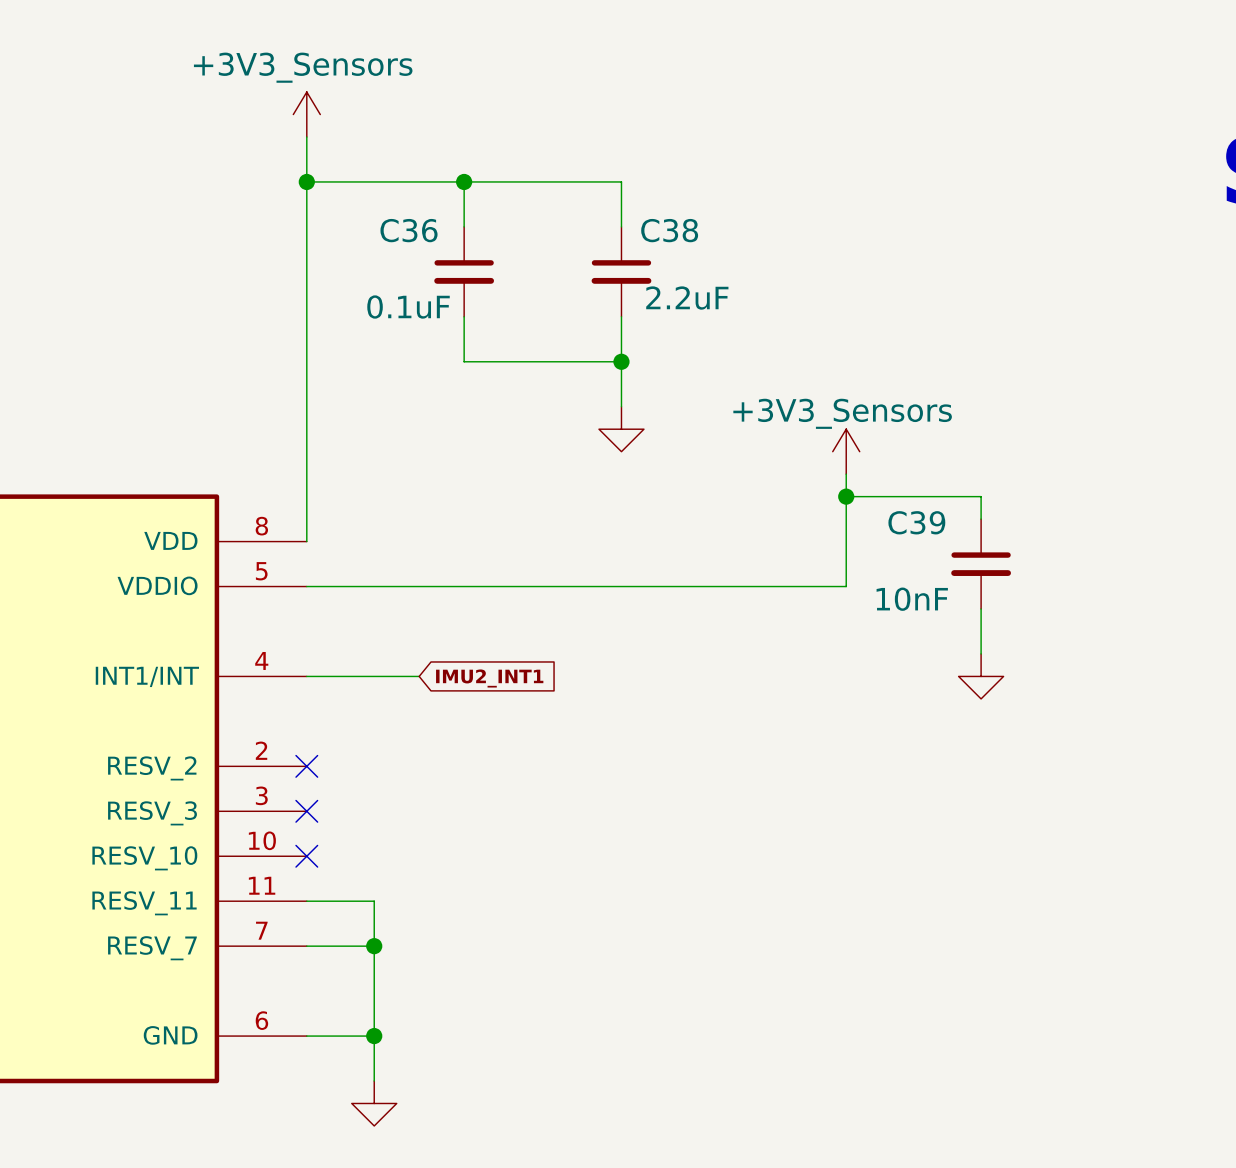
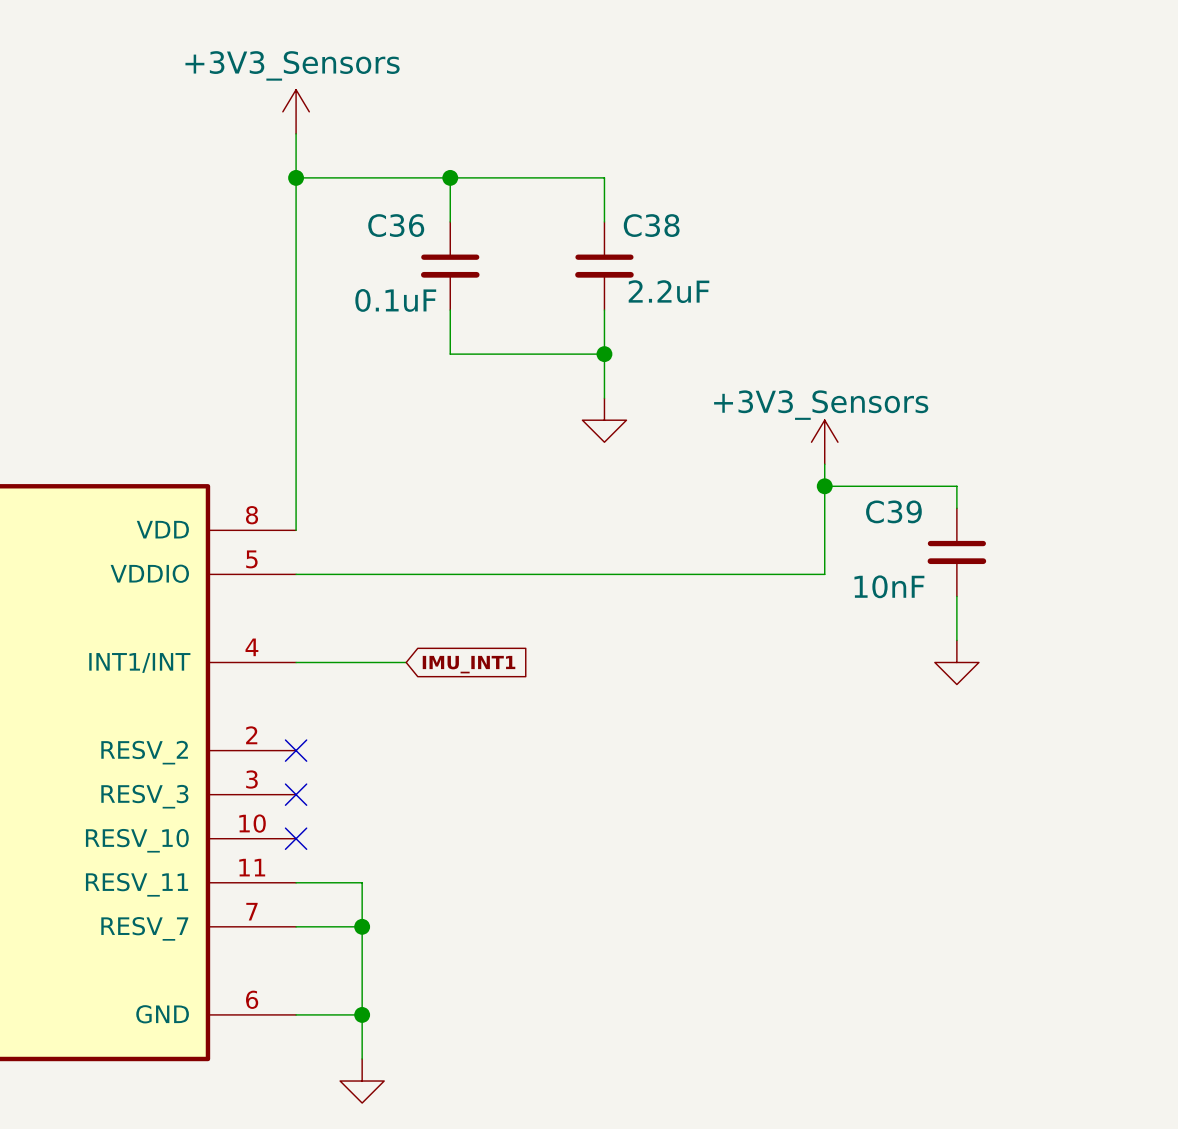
global label: IMU2_INT1 (489, 678) -> IMU_INT1 (469, 664)

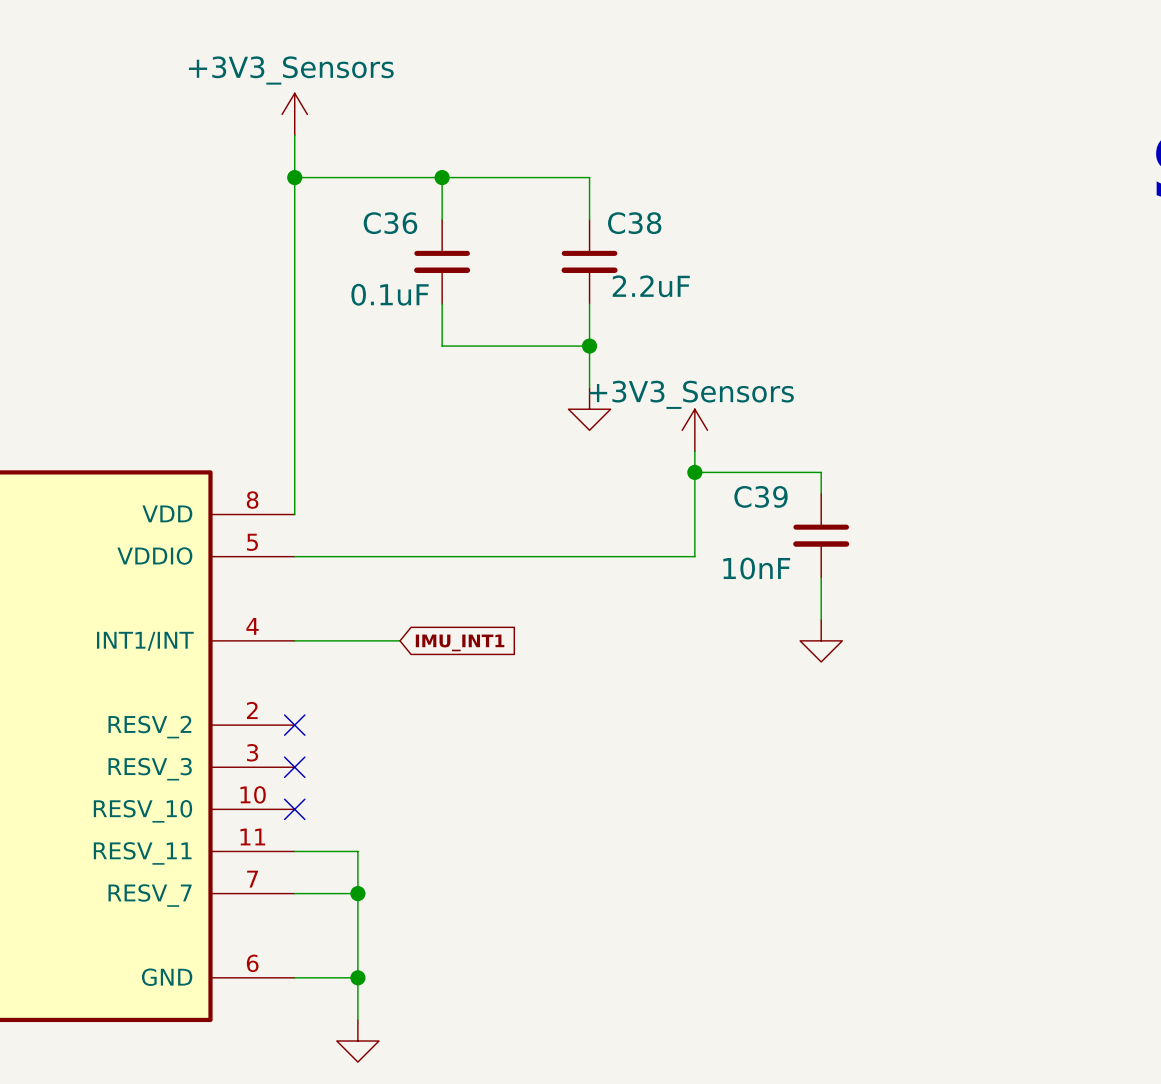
power symbol position: +3V3_Sensors (824, 442) -> +3V3_Sensors (694, 430)
wire: (824, 464) (824, 574) (714, 574) -> (694, 451) (694, 556)
wire: none -> (694, 472) (800, 472)
junction: none -> (694, 472)
junction: (824, 486) -> none
wire: (846, 486) (956, 486) (956, 508) -> (821, 472) (821, 493)
C39 position: (956, 552) -> (821, 535)
wire: (956, 596) (956, 640) -> (821, 577) (821, 619)
power symbol position: (956, 662) -> (821, 640)

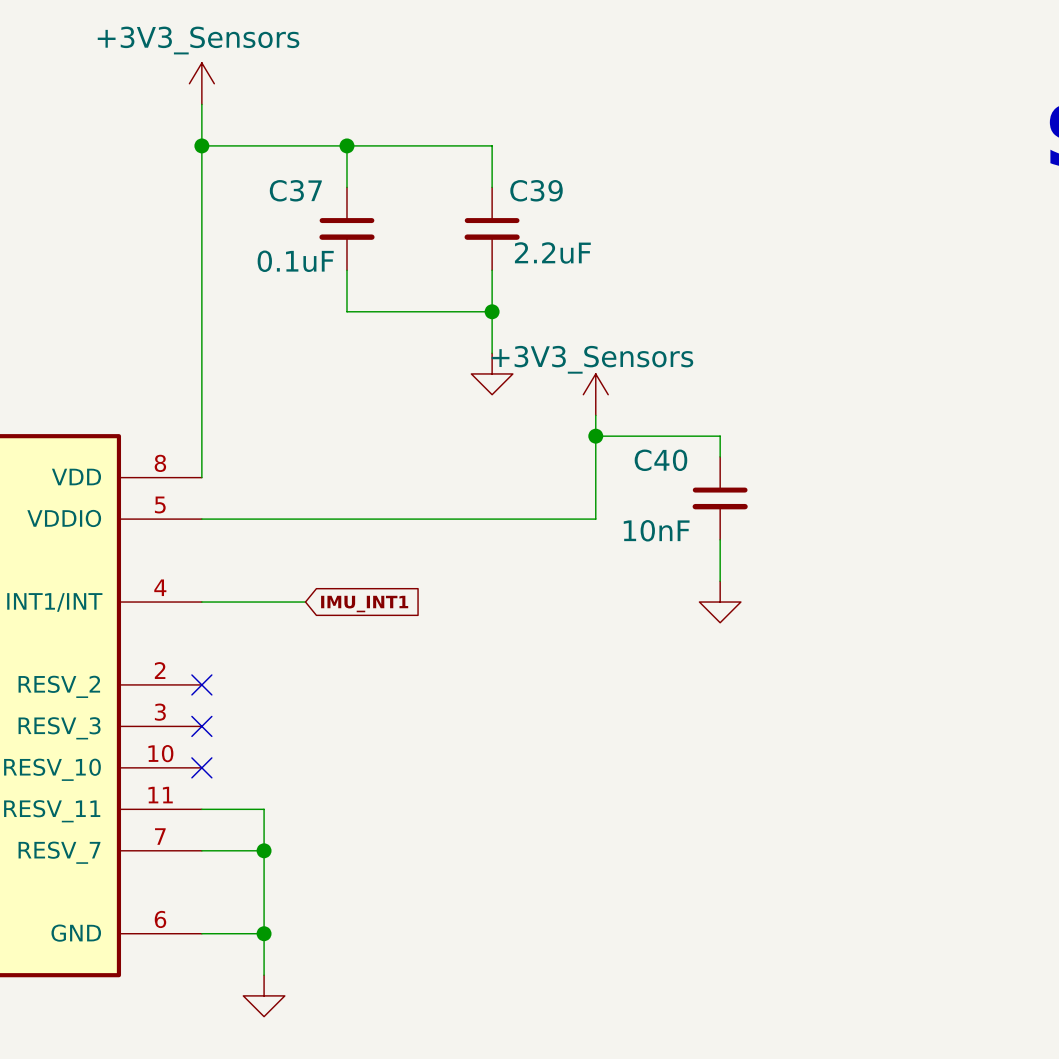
C36 name: C36 (390, 223) -> C37 (295, 190)
C38 name: C38 (634, 223) -> C39 (536, 190)
C39 name: C39 (761, 496) -> C40 (660, 460)

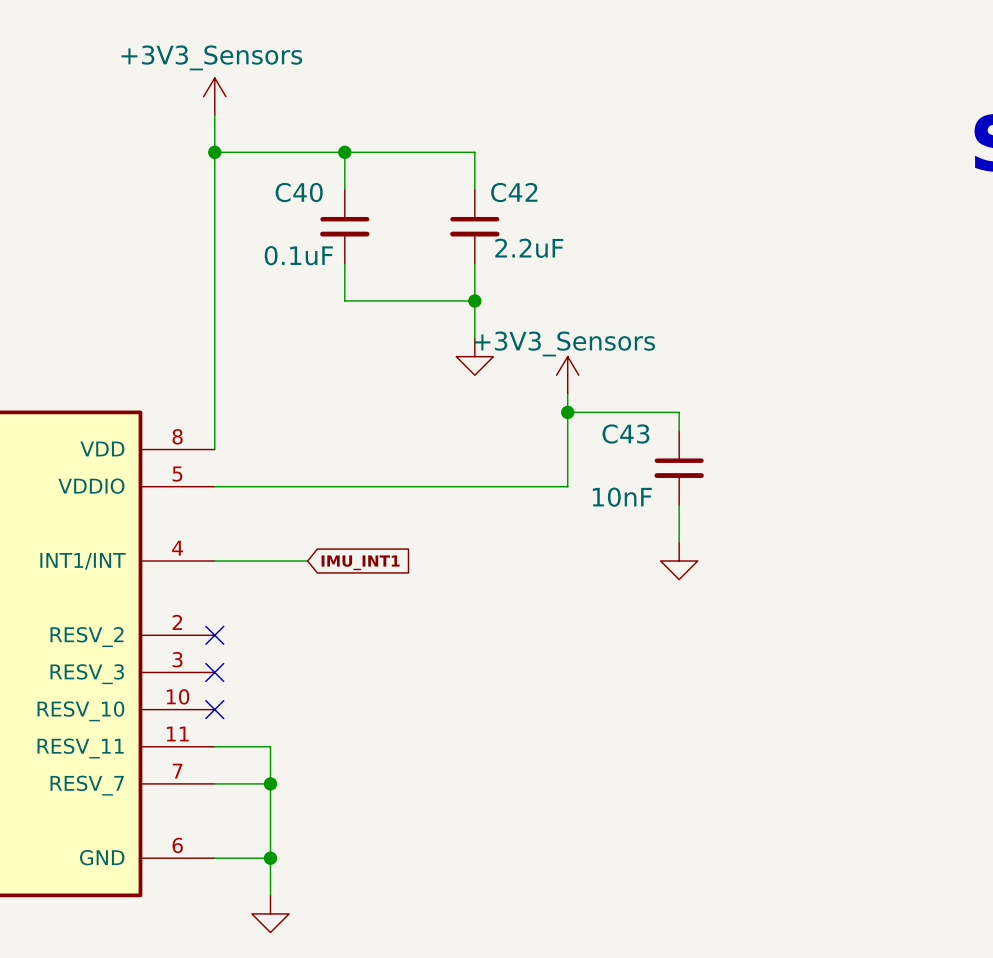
C37 name: C37 (295, 190) -> C40 (299, 192)
C39 name: C39 (536, 190) -> C42 (514, 192)
C40 name: C40 (660, 460) -> C43 (625, 434)

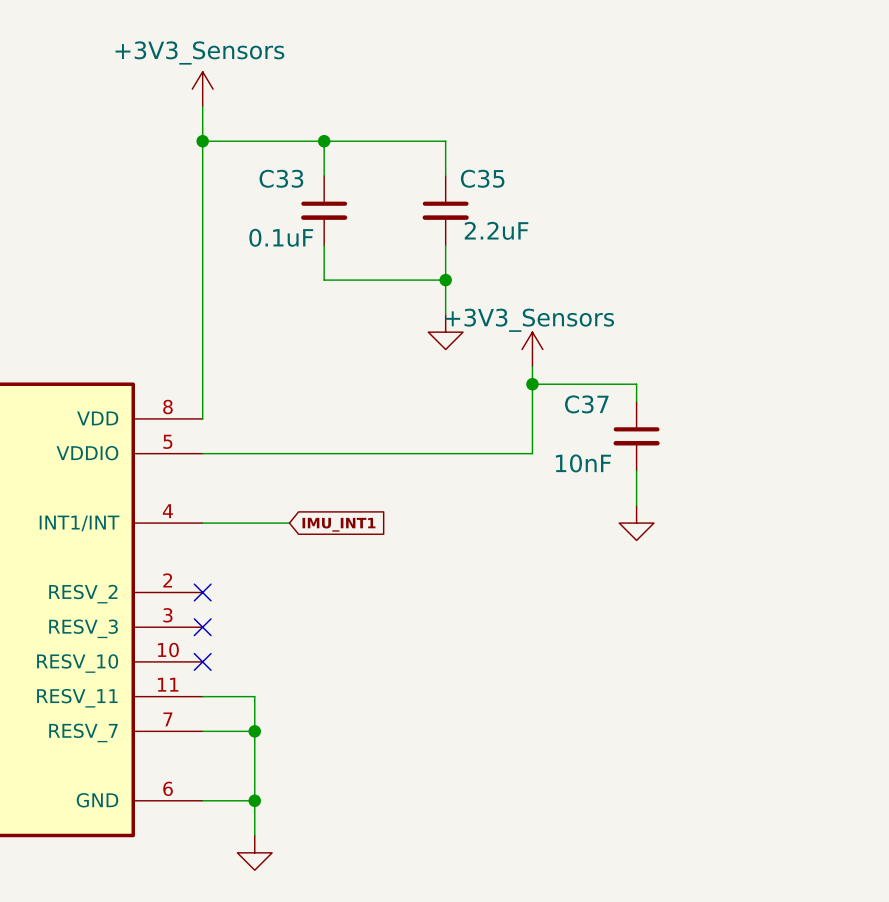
C40 name: C40 (299, 192) -> C33 (281, 178)
C42 name: C42 (514, 192) -> C35 (482, 178)
C43 name: C43 (625, 434) -> C37 (586, 404)

